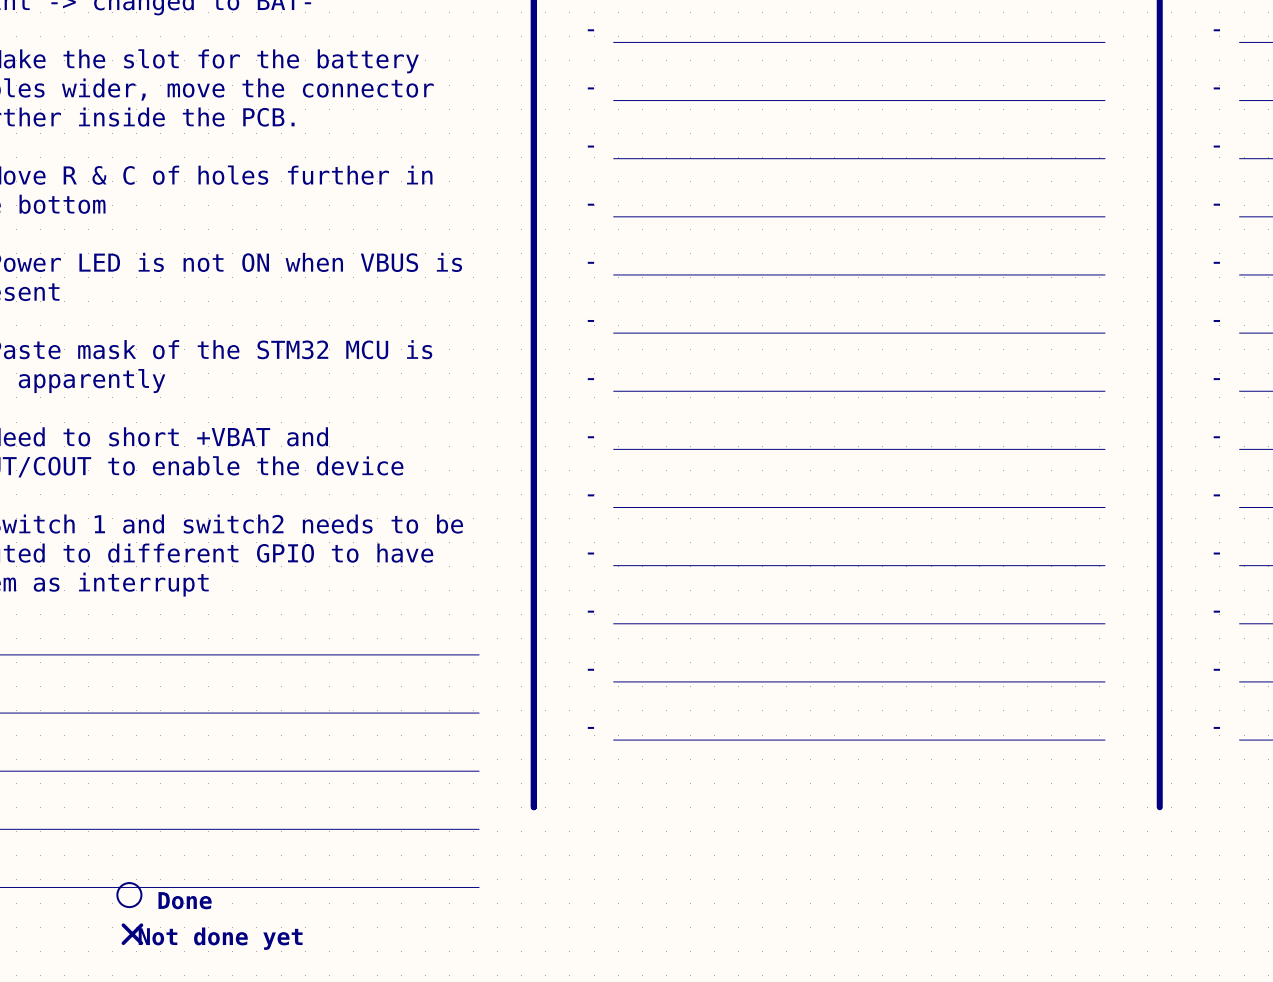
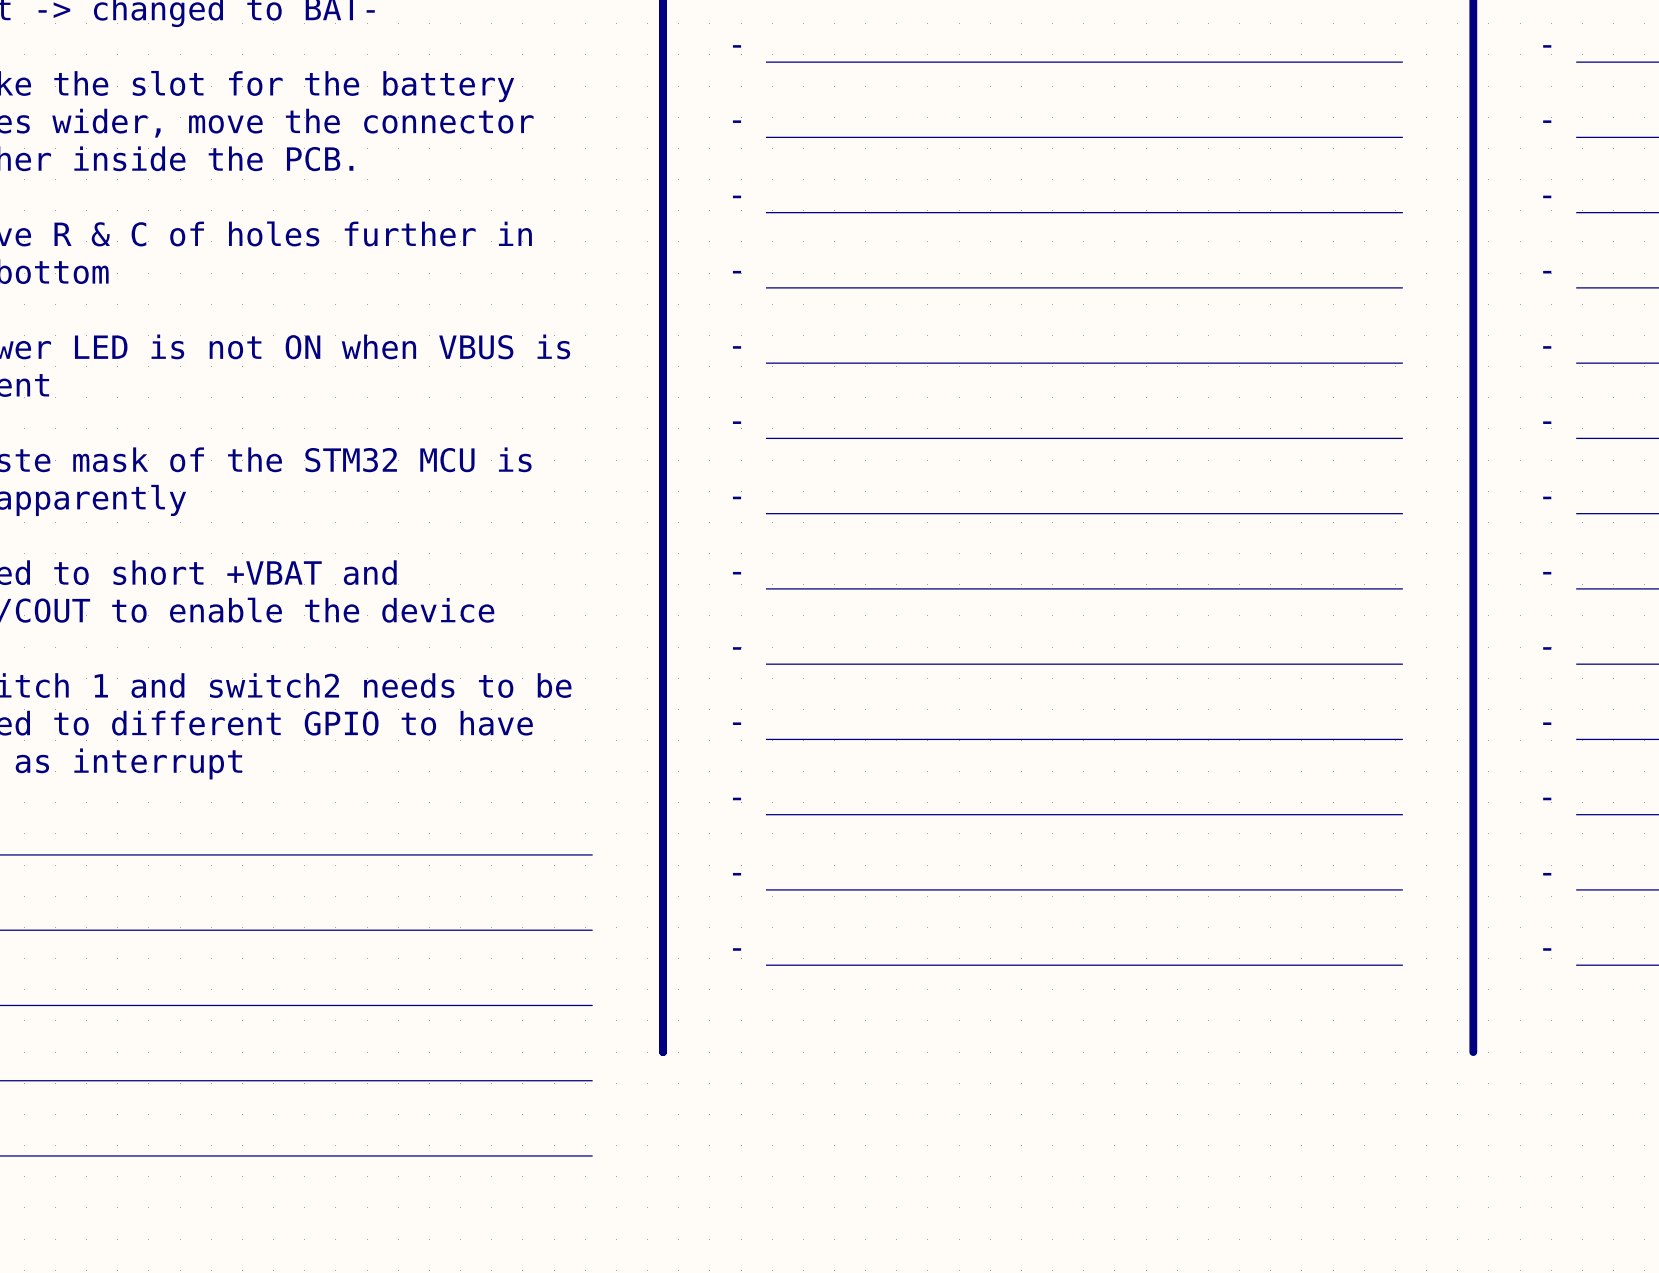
drawing: [117, 883, 142, 908] -> none
text: Done (185, 900) -> none
line: (123, 925) (141, 943) -> none
line: (141, 925) (123, 943) -> none
text: Not done yet (220, 938) -> none

